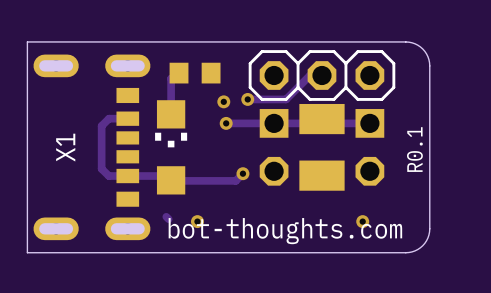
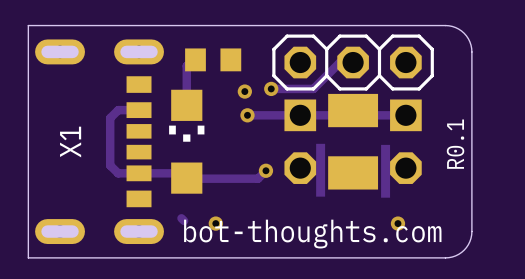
drawing: none -> [316, 143, 326, 197]
drawing: none -> [381, 144, 391, 198]

